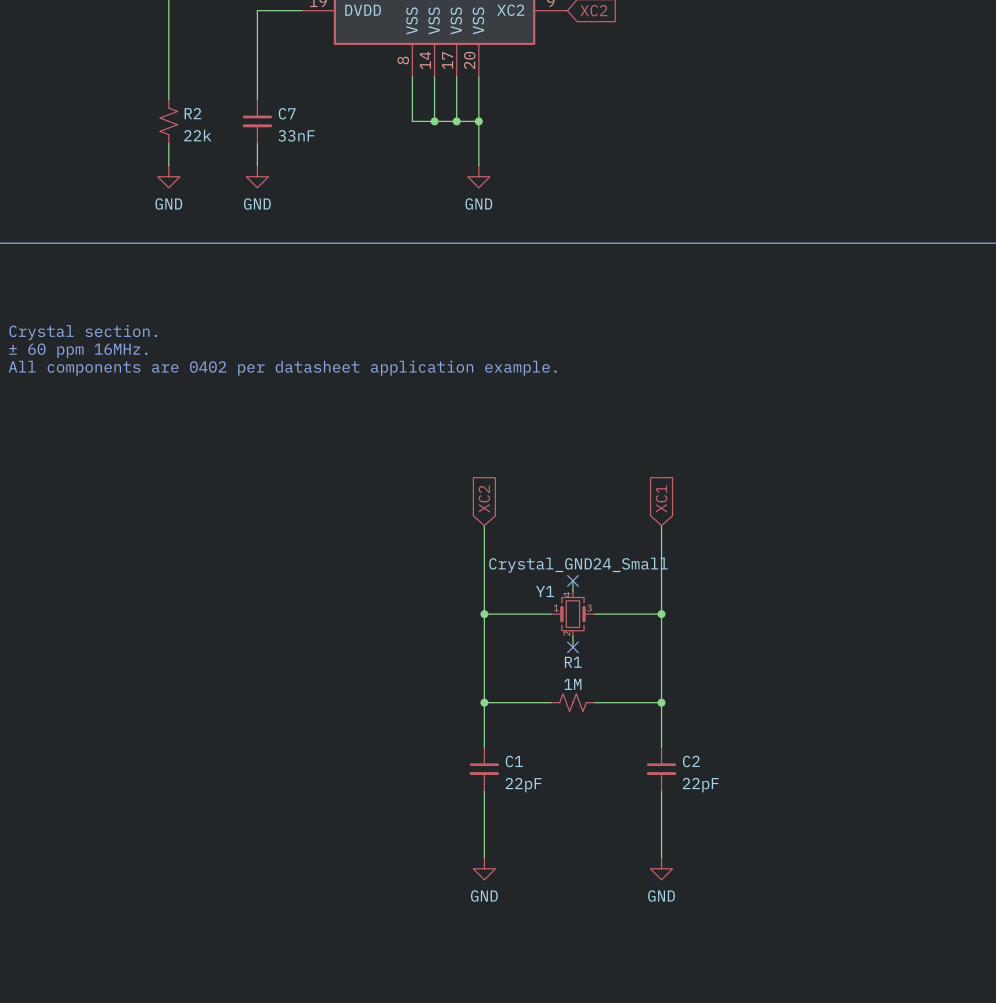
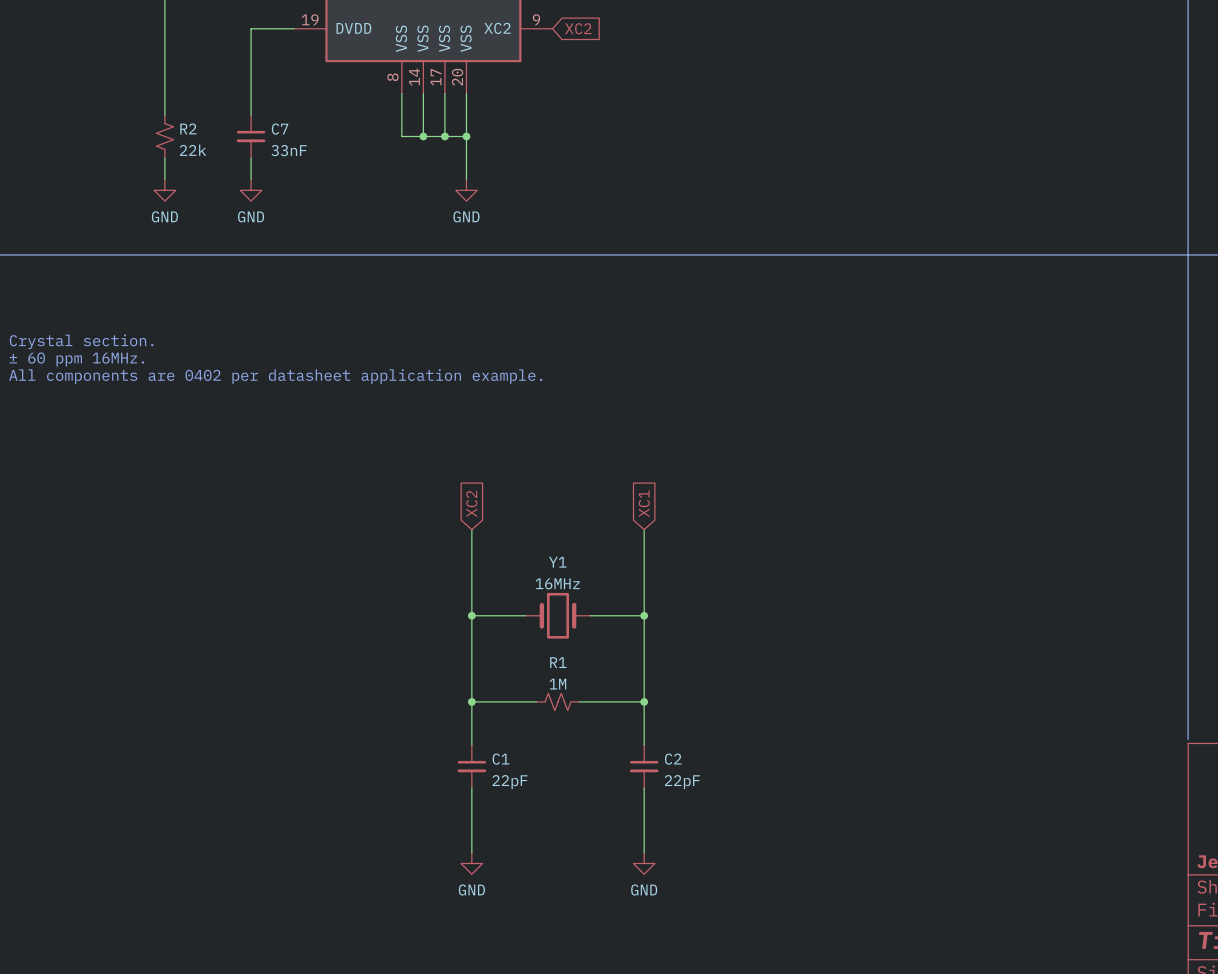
Y1 value: Crystal_GND24_Small (578, 565) -> 16MHz (557, 583)
wire: (572, 580) (572, 591) -> none
no-connect mark: (572, 580) -> none
Y1 name position: Y1 (545, 591) -> Y1 (557, 562)
Y1 symbol: [550, 591, 596, 637] -> [525, 592, 591, 639]
wire: (572, 636) (572, 647) -> none
no-connect mark: (572, 647) -> none

